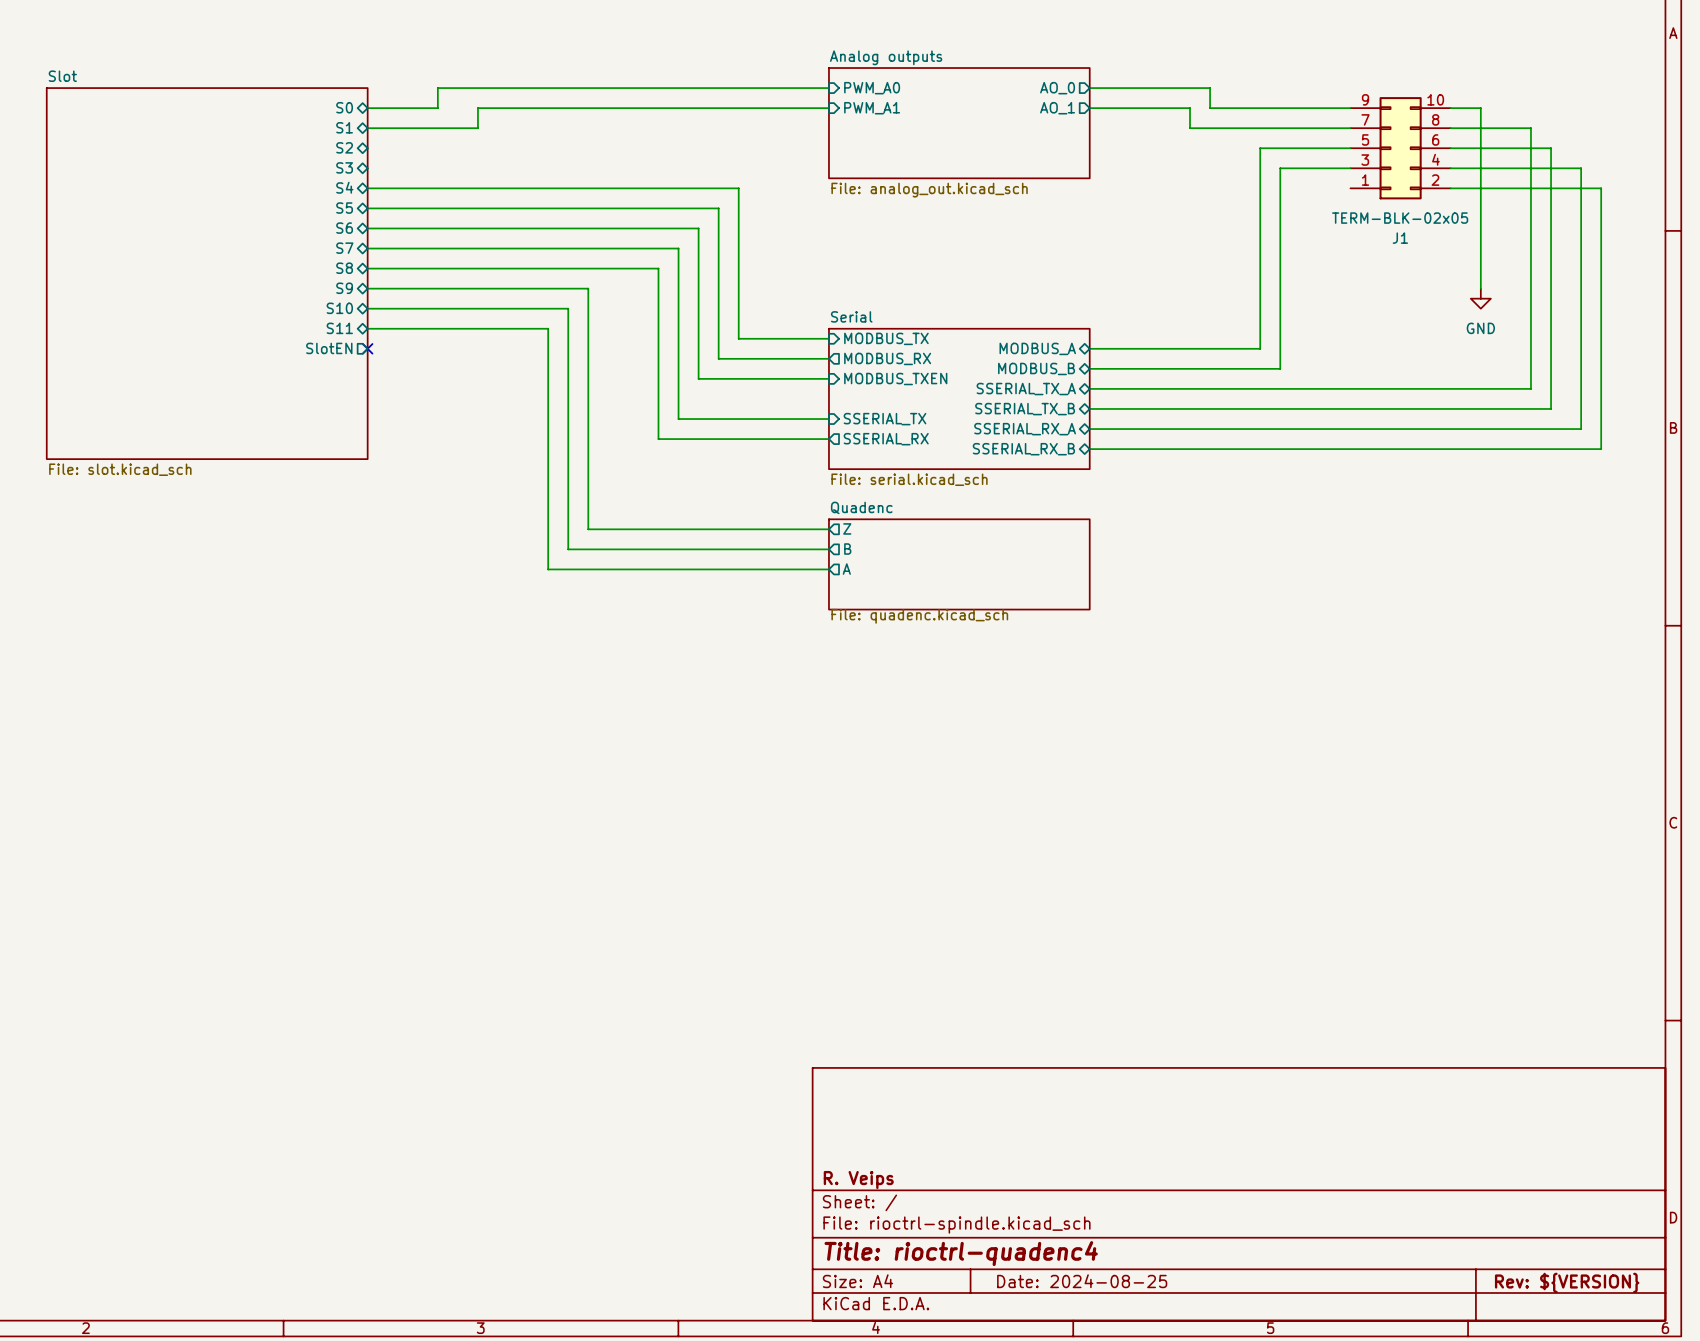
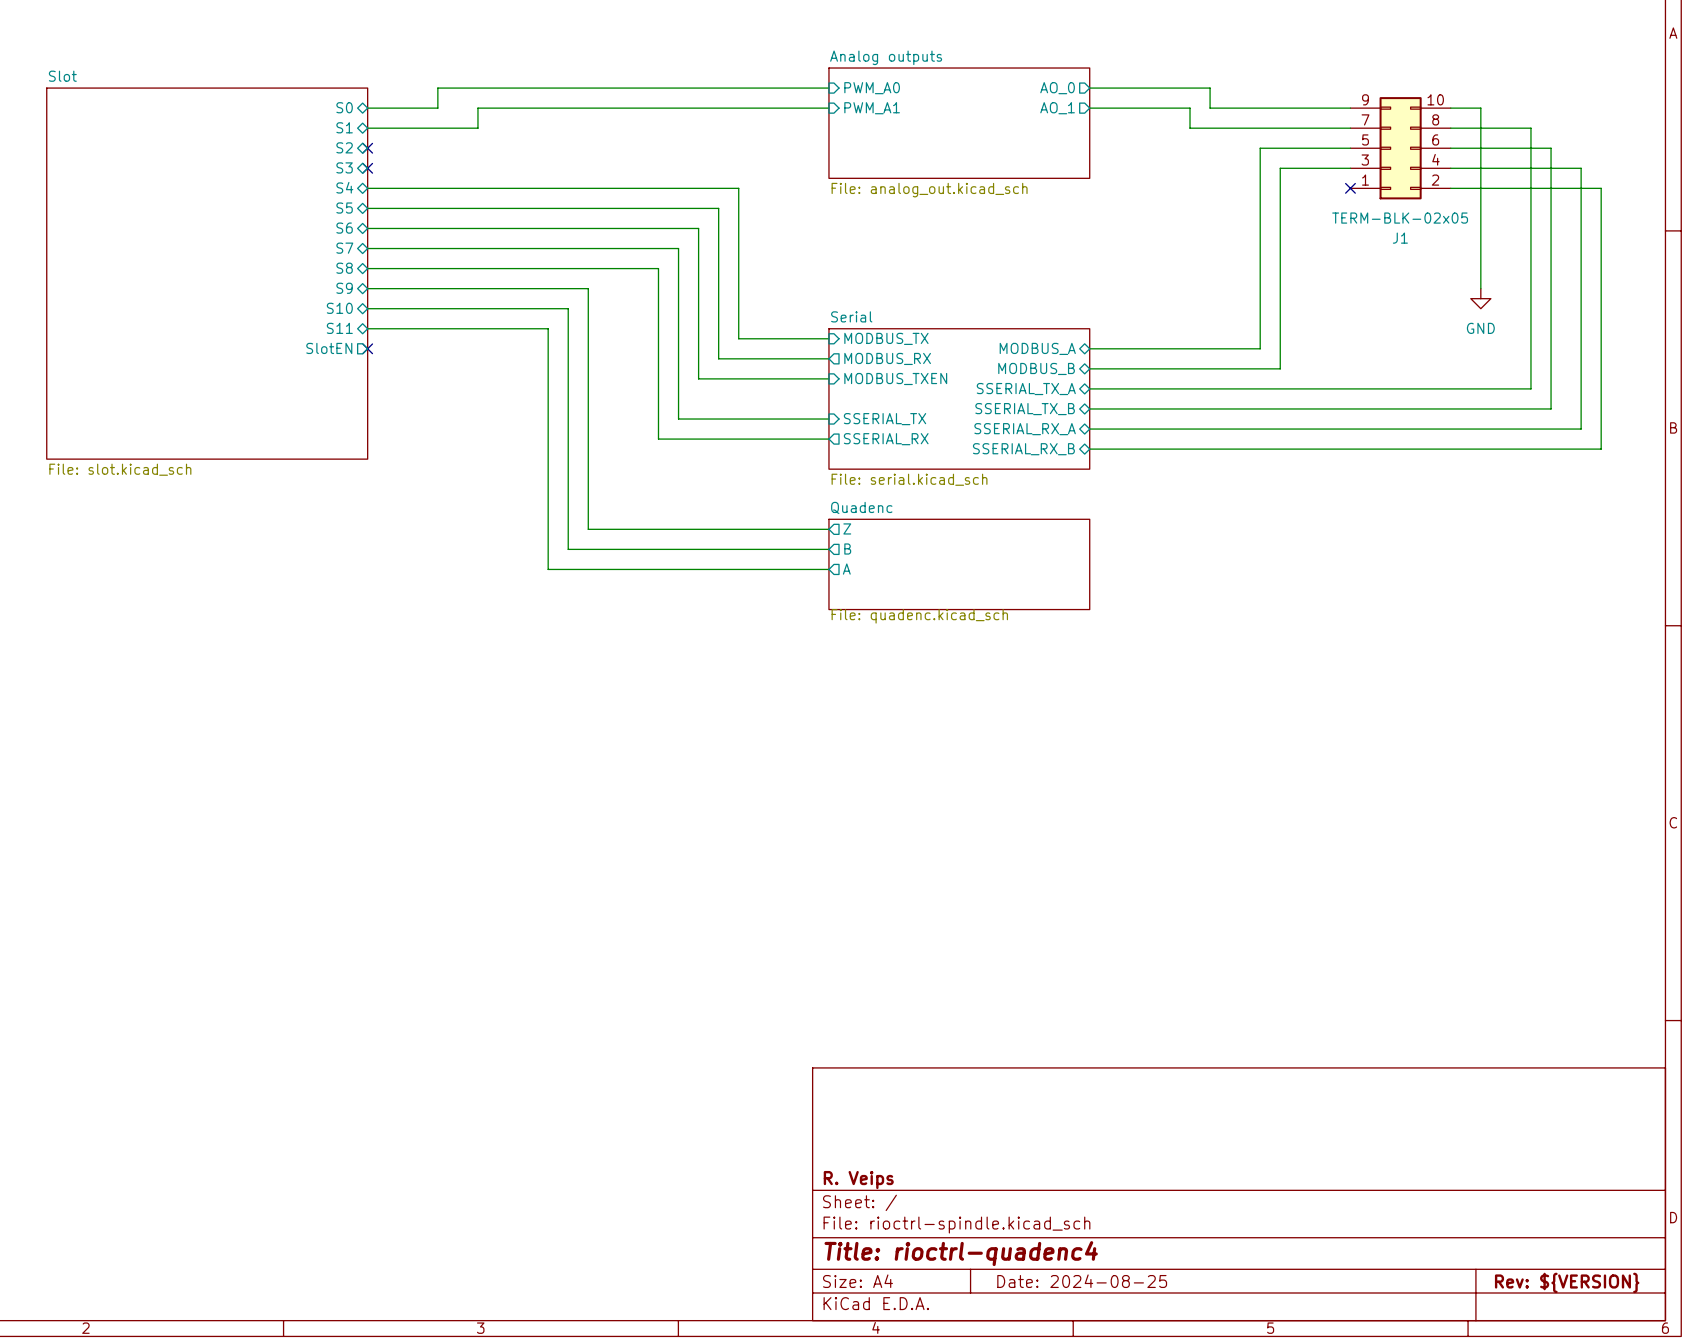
no-connect mark: none -> (367, 148)
no-connect mark: none -> (367, 168)
no-connect mark: none -> (1350, 188)

